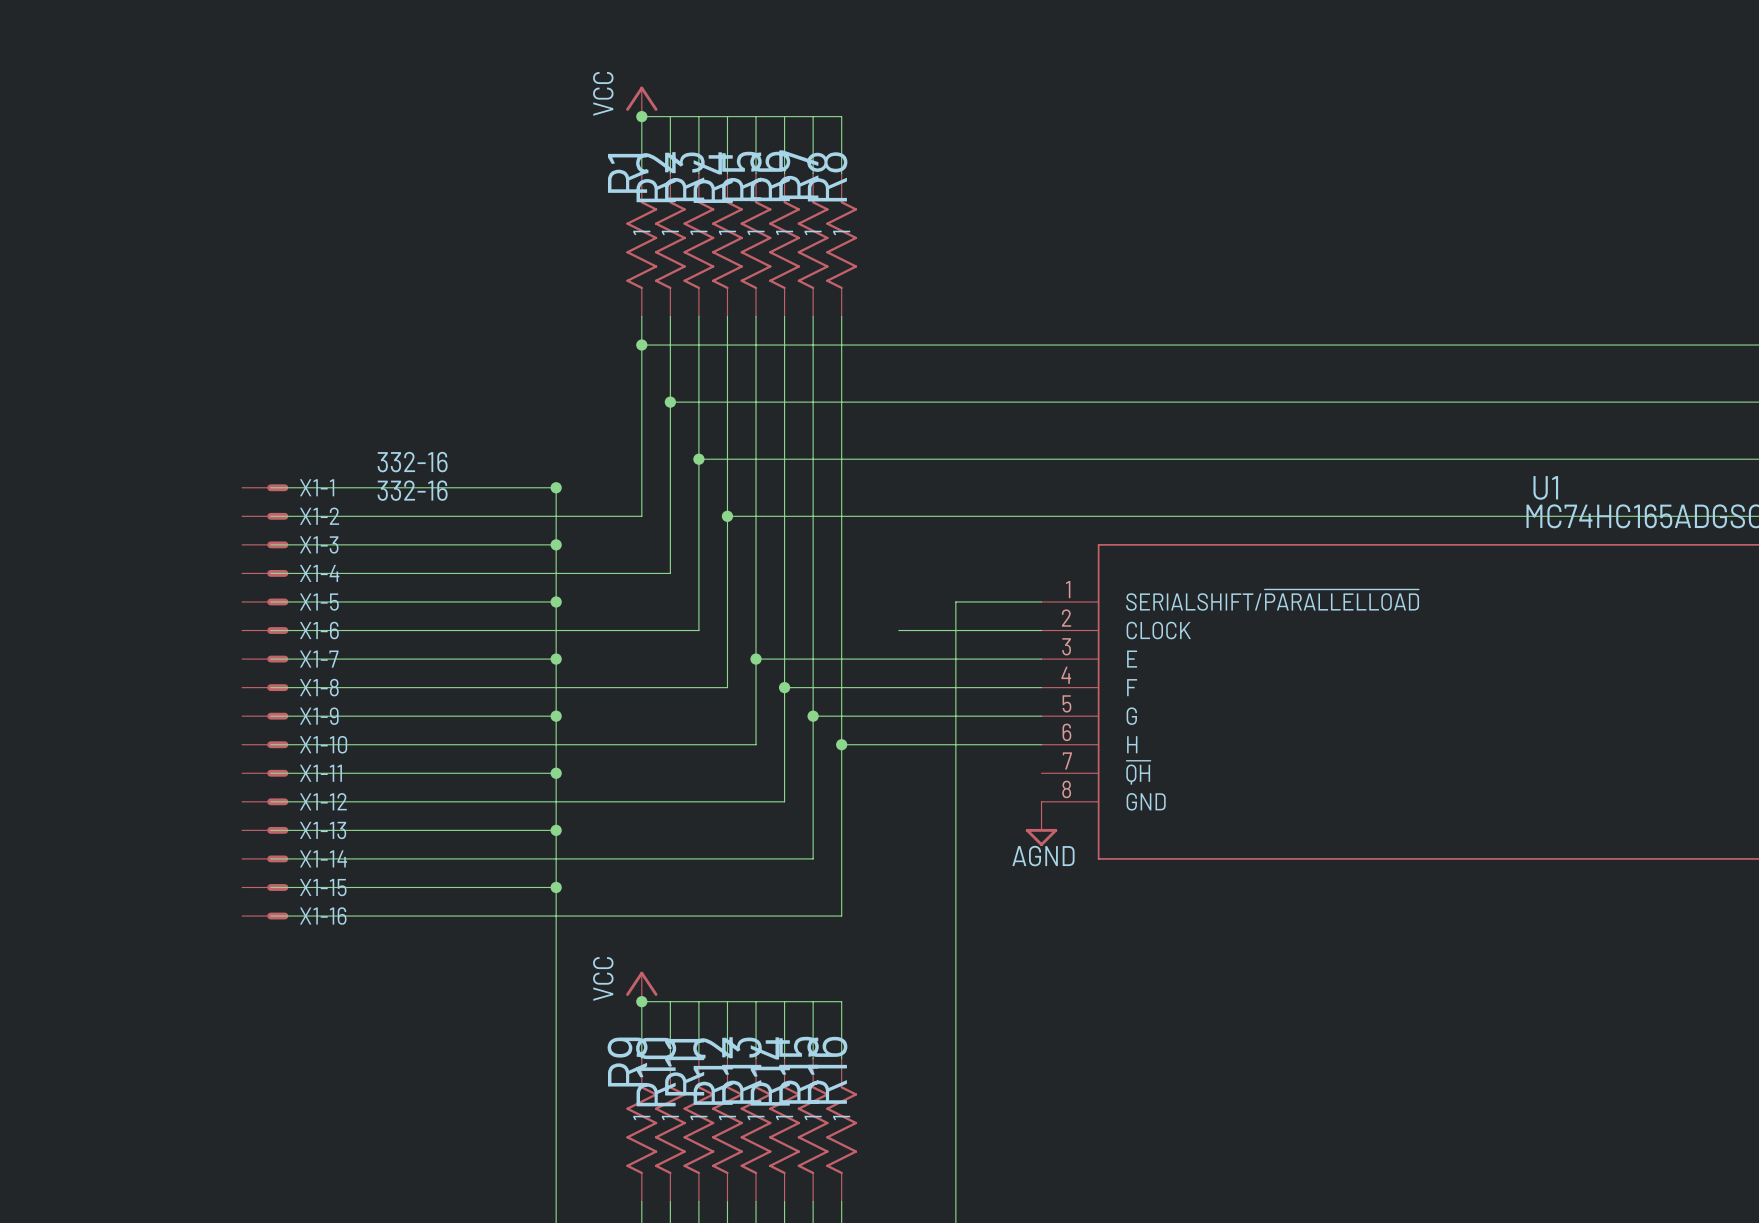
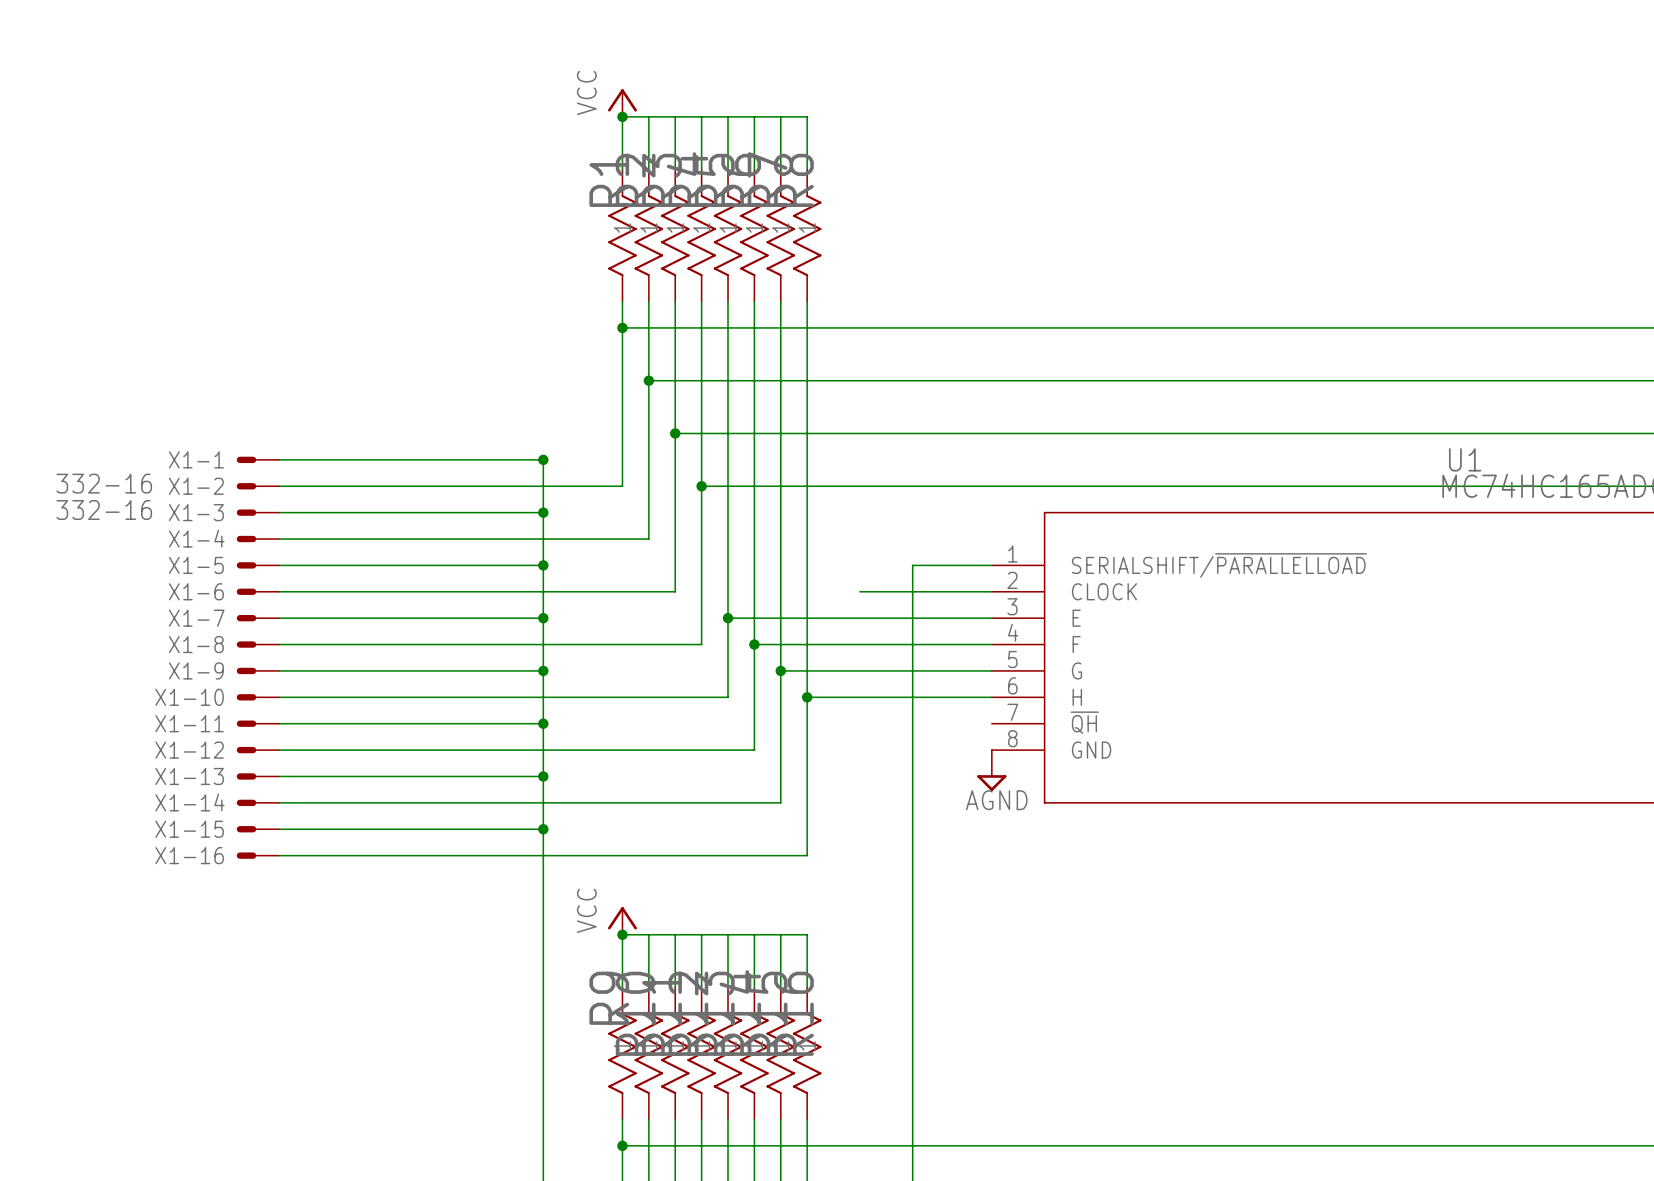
X1-1 rotation: 0° (277, 487) -> 180° (246, 459)
X1-2 rotation: 0° (277, 516) -> 180° (246, 486)
X1-3 rotation: 0° (277, 544) -> 180° (246, 512)
X1-4 rotation: 0° (277, 573) -> 180° (246, 539)
X1-5 rotation: 0° (277, 601) -> 180° (246, 565)
X1-6 rotation: 0° (277, 630) -> 180° (246, 591)
X1-7 rotation: 0° (277, 659) -> 180° (246, 618)
X1-8 rotation: 0° (277, 687) -> 180° (246, 644)
X1-9 rotation: 0° (277, 716) -> 180° (246, 670)
X1-10 rotation: 0° (277, 744) -> 180° (246, 697)
X1-11 rotation: 0° (277, 773) -> 180° (246, 723)
X1-12 rotation: 0° (277, 801) -> 180° (246, 750)
X1-13 rotation: 0° (277, 830) -> 180° (246, 776)
X1-14 rotation: 0° (277, 858) -> 180° (246, 802)
X1-15 rotation: 0° (277, 887) -> 180° (246, 829)
X1-16 rotation: 0° (277, 916) -> 180° (246, 855)

